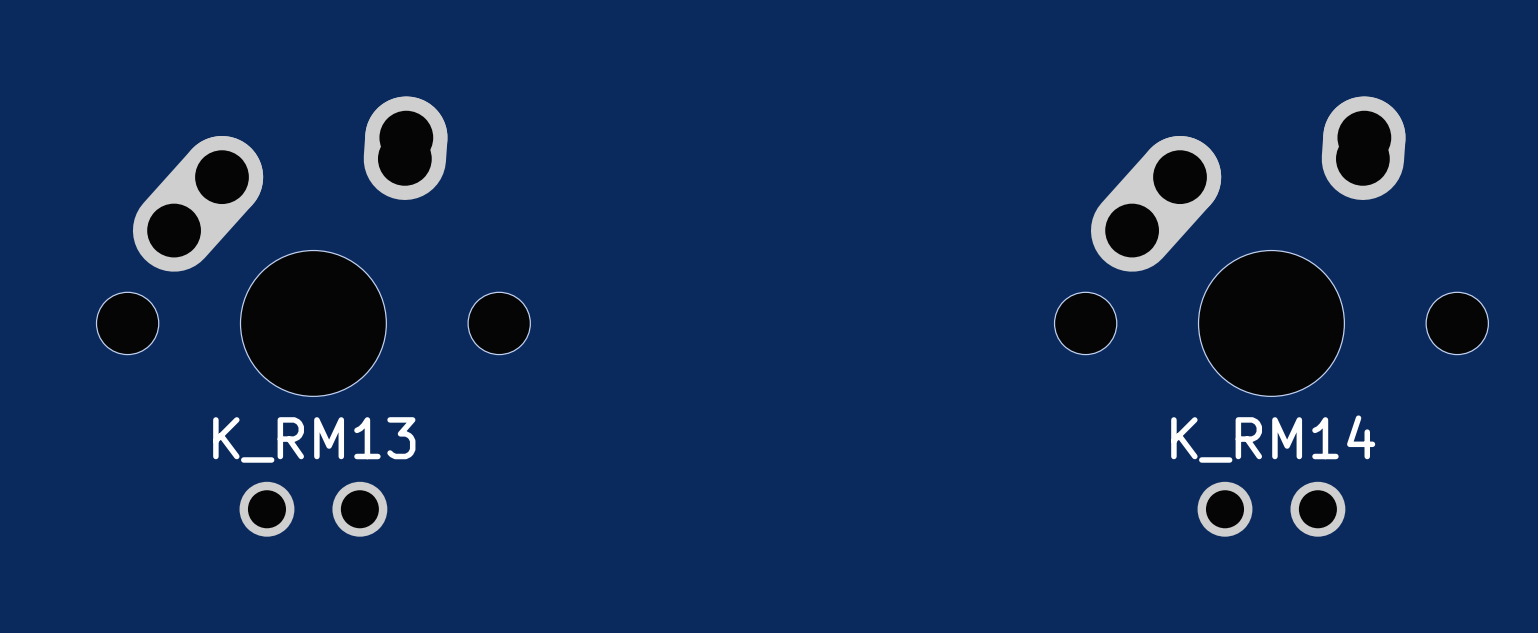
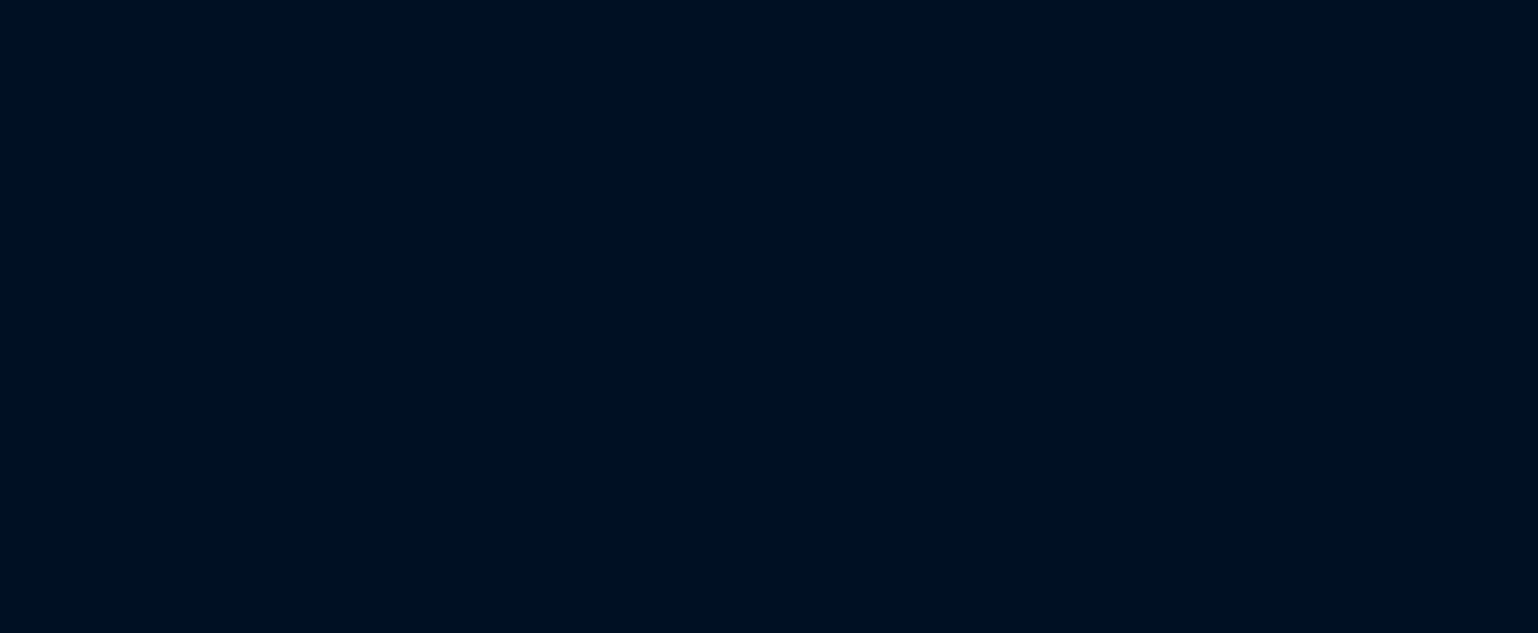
K_RM13: (313, 316) -> none
K_RM14: (1271, 316) -> none

